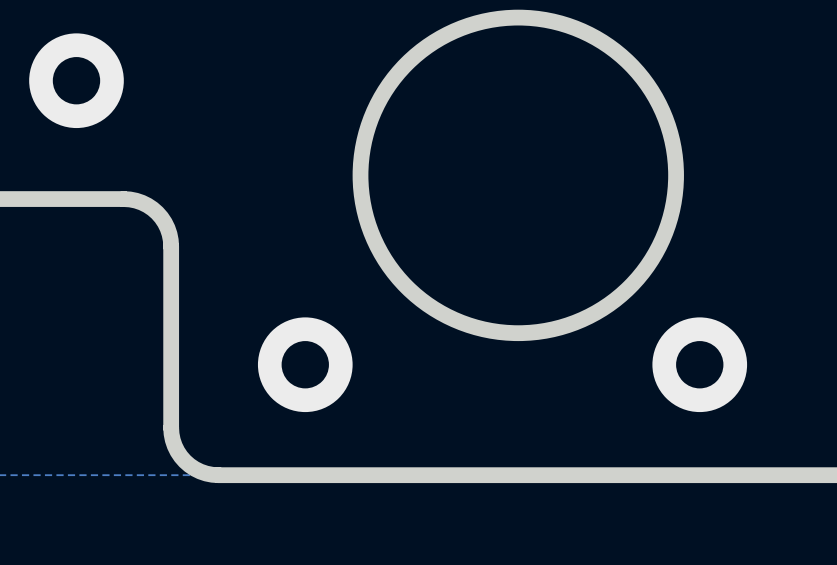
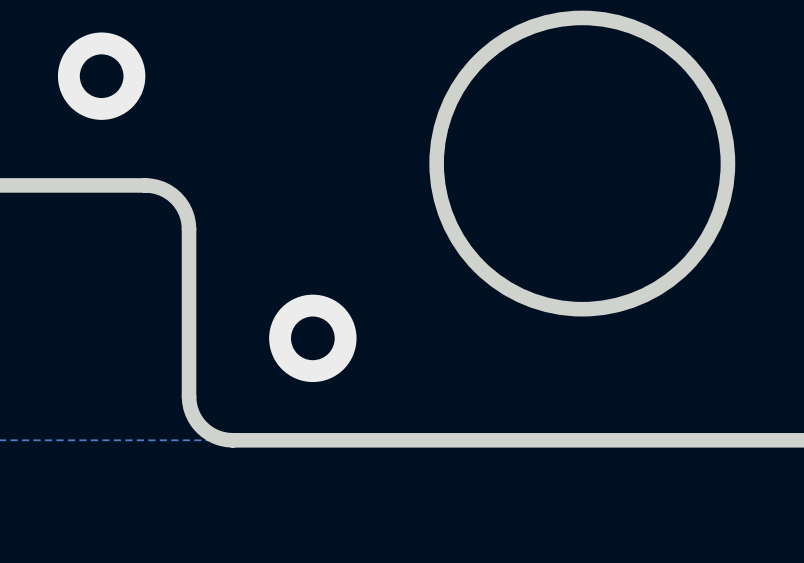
round board edge position: (518, 175) -> (582, 163)
via: (699, 364) -> none

